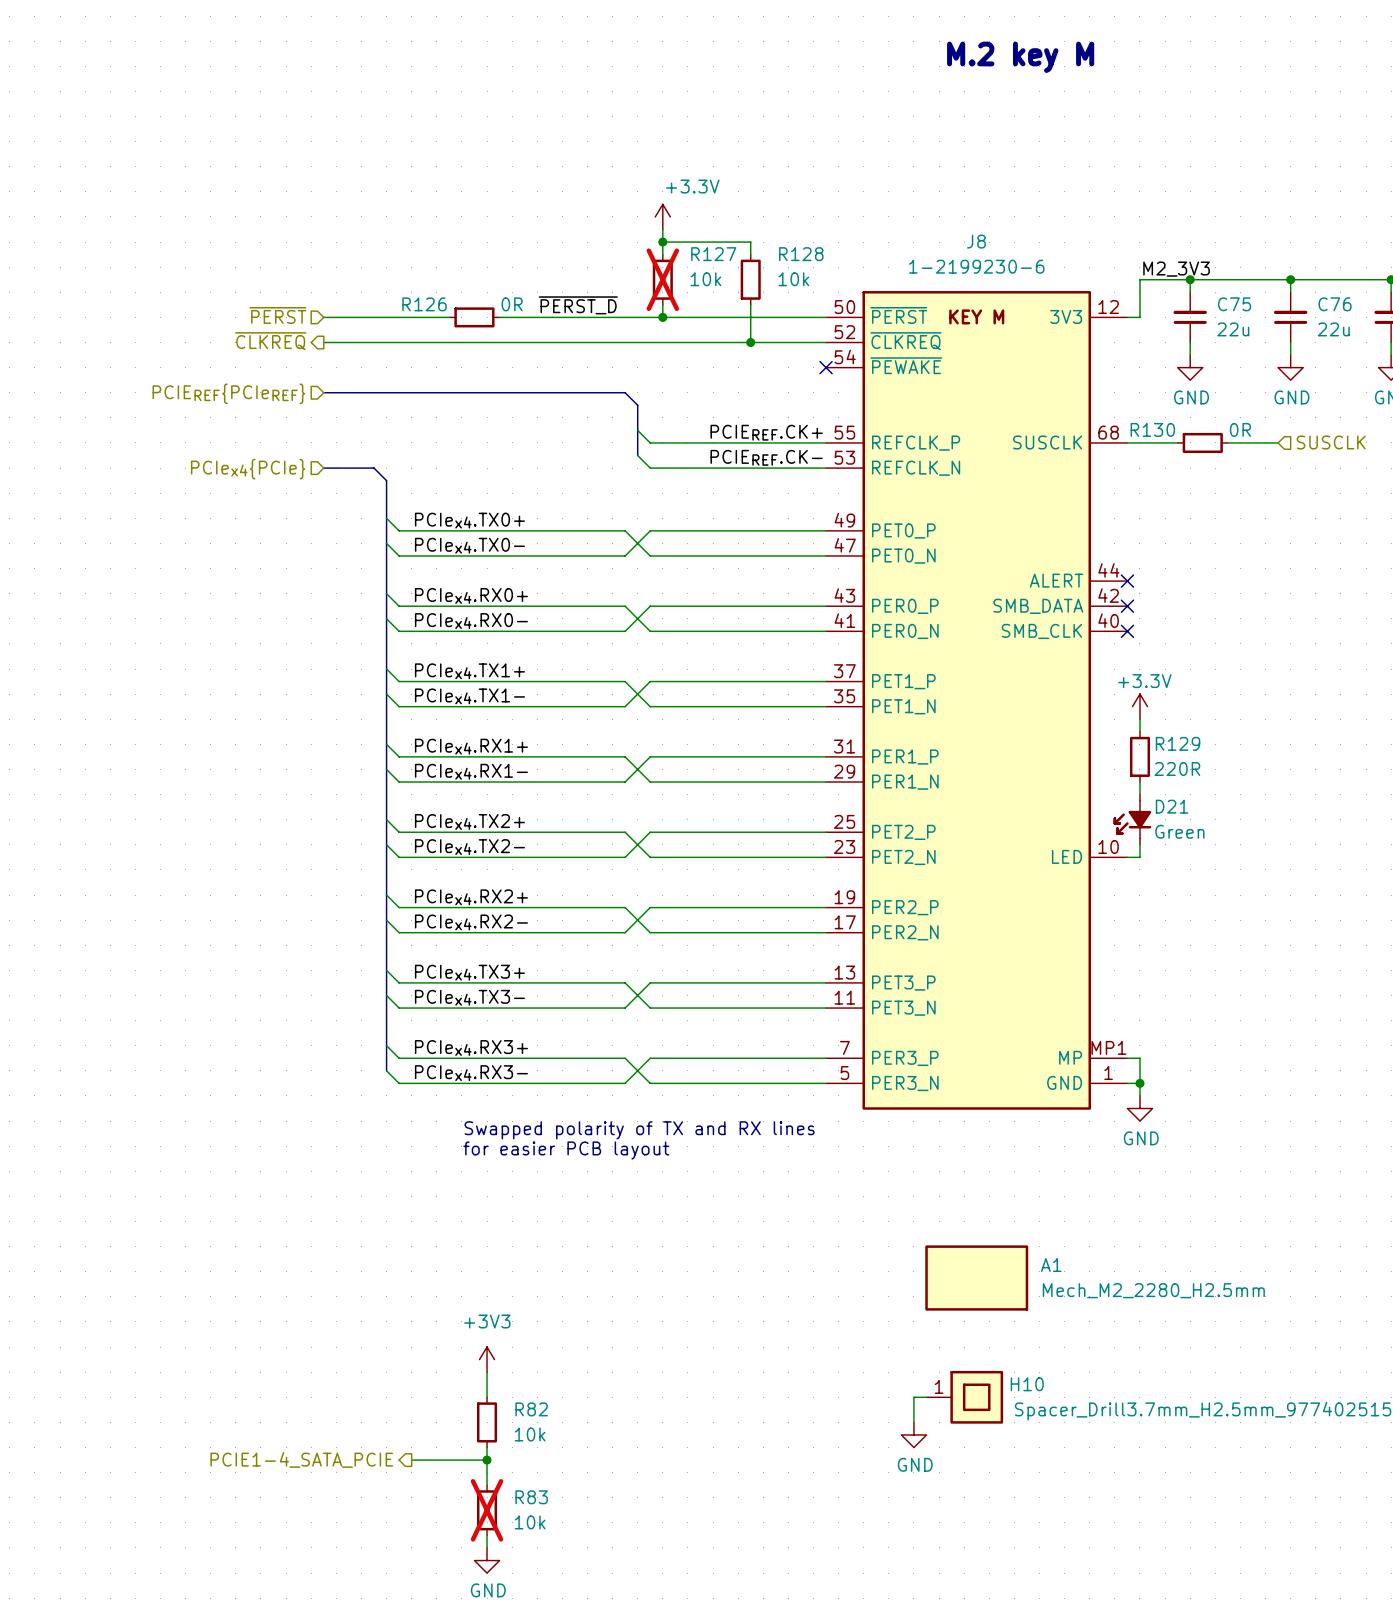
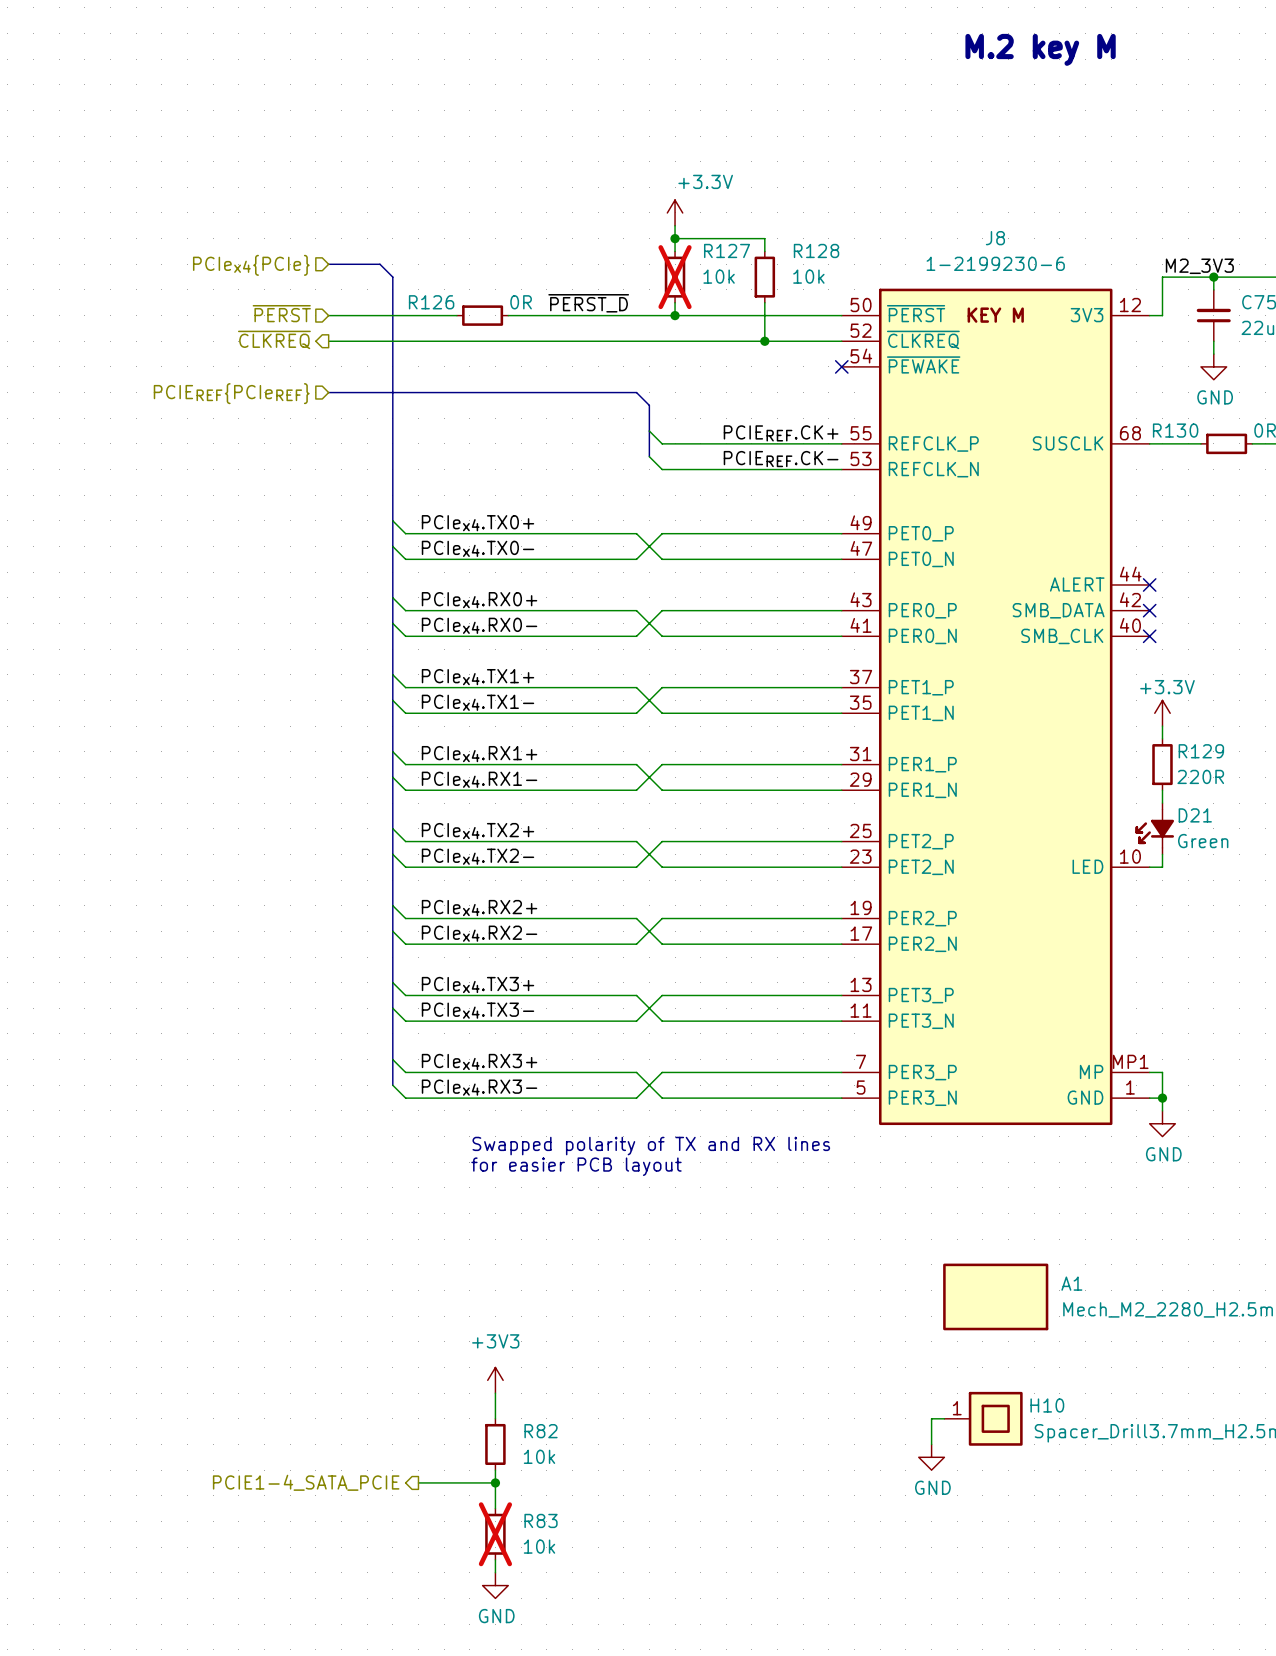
bus: (323, 468) (374, 468) (386, 480) -> (328, 264) (379, 264) (392, 277) (392, 482)
hierarchical label position: PCIex4{PCIe} (248, 469) -> PCIex4{PCIe} (251, 265)

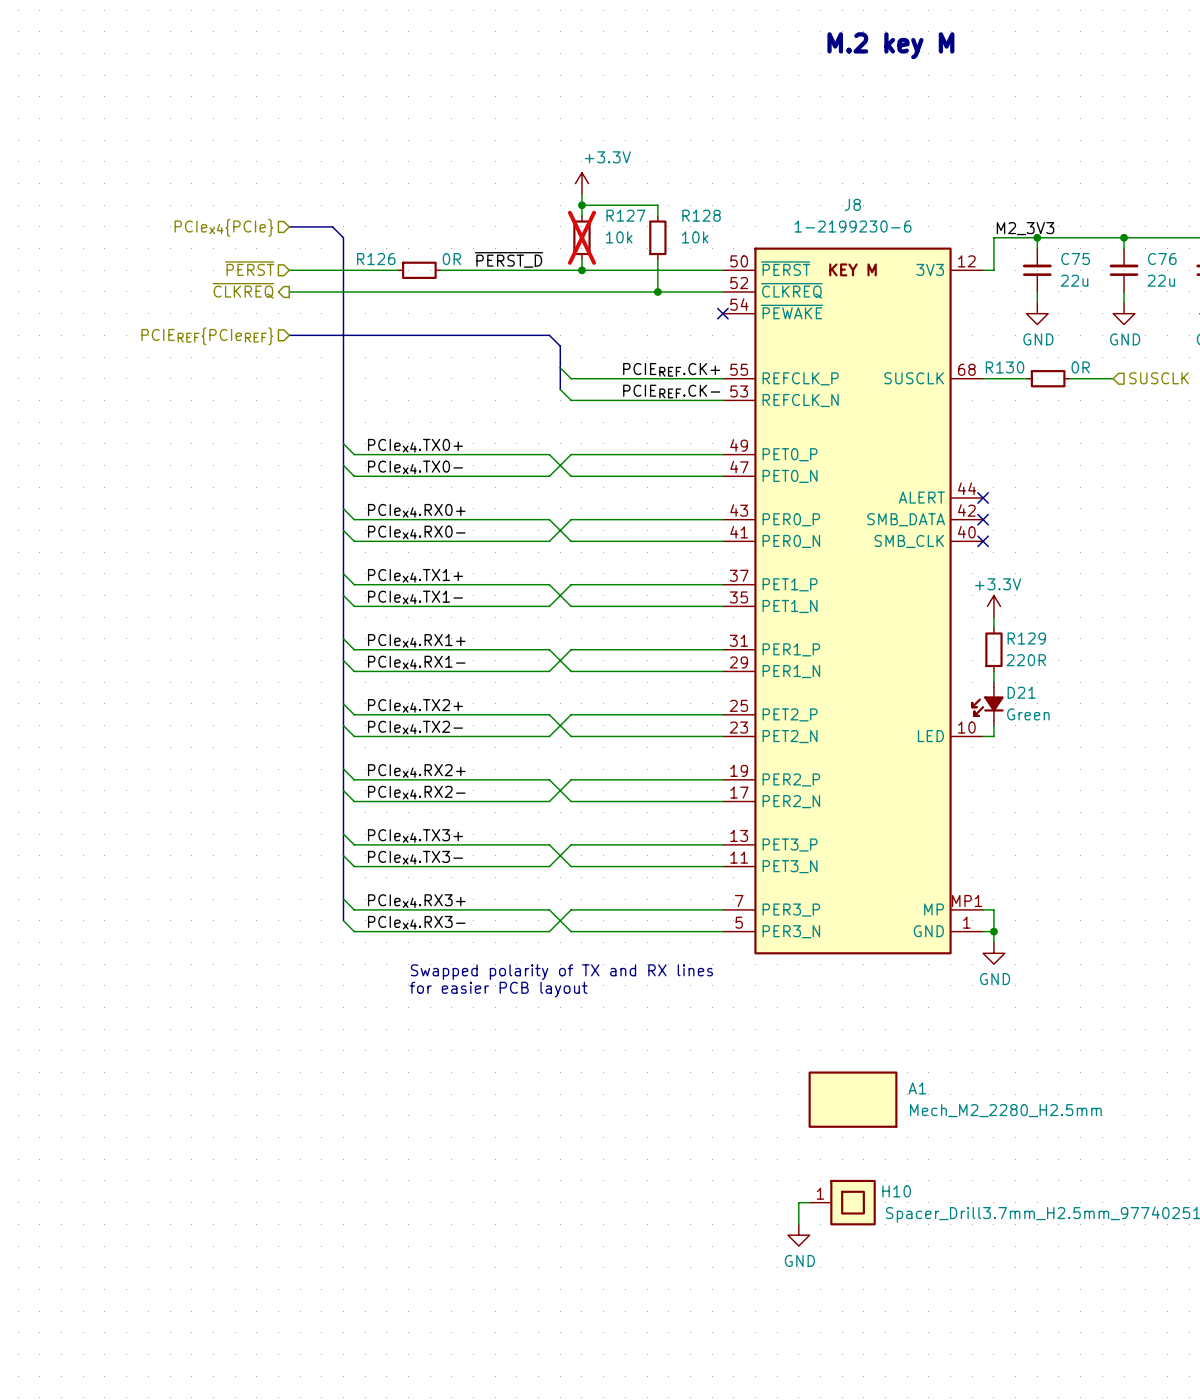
power symbol: +3V3 (495, 1380) -> none
wire: (495, 1393) (495, 1418) -> none
R82: (495, 1444) -> none
wire: (495, 1470) (495, 1508) -> none
hierarchical label: PCIE1-4_SATA_PCIE (306, 1482) -> none
wire: (418, 1482) (495, 1482) -> none
junction: (495, 1482) -> none
R83: (495, 1534) -> none
wire: (495, 1559) (495, 1572) -> none
power symbol: GND (495, 1585) -> none

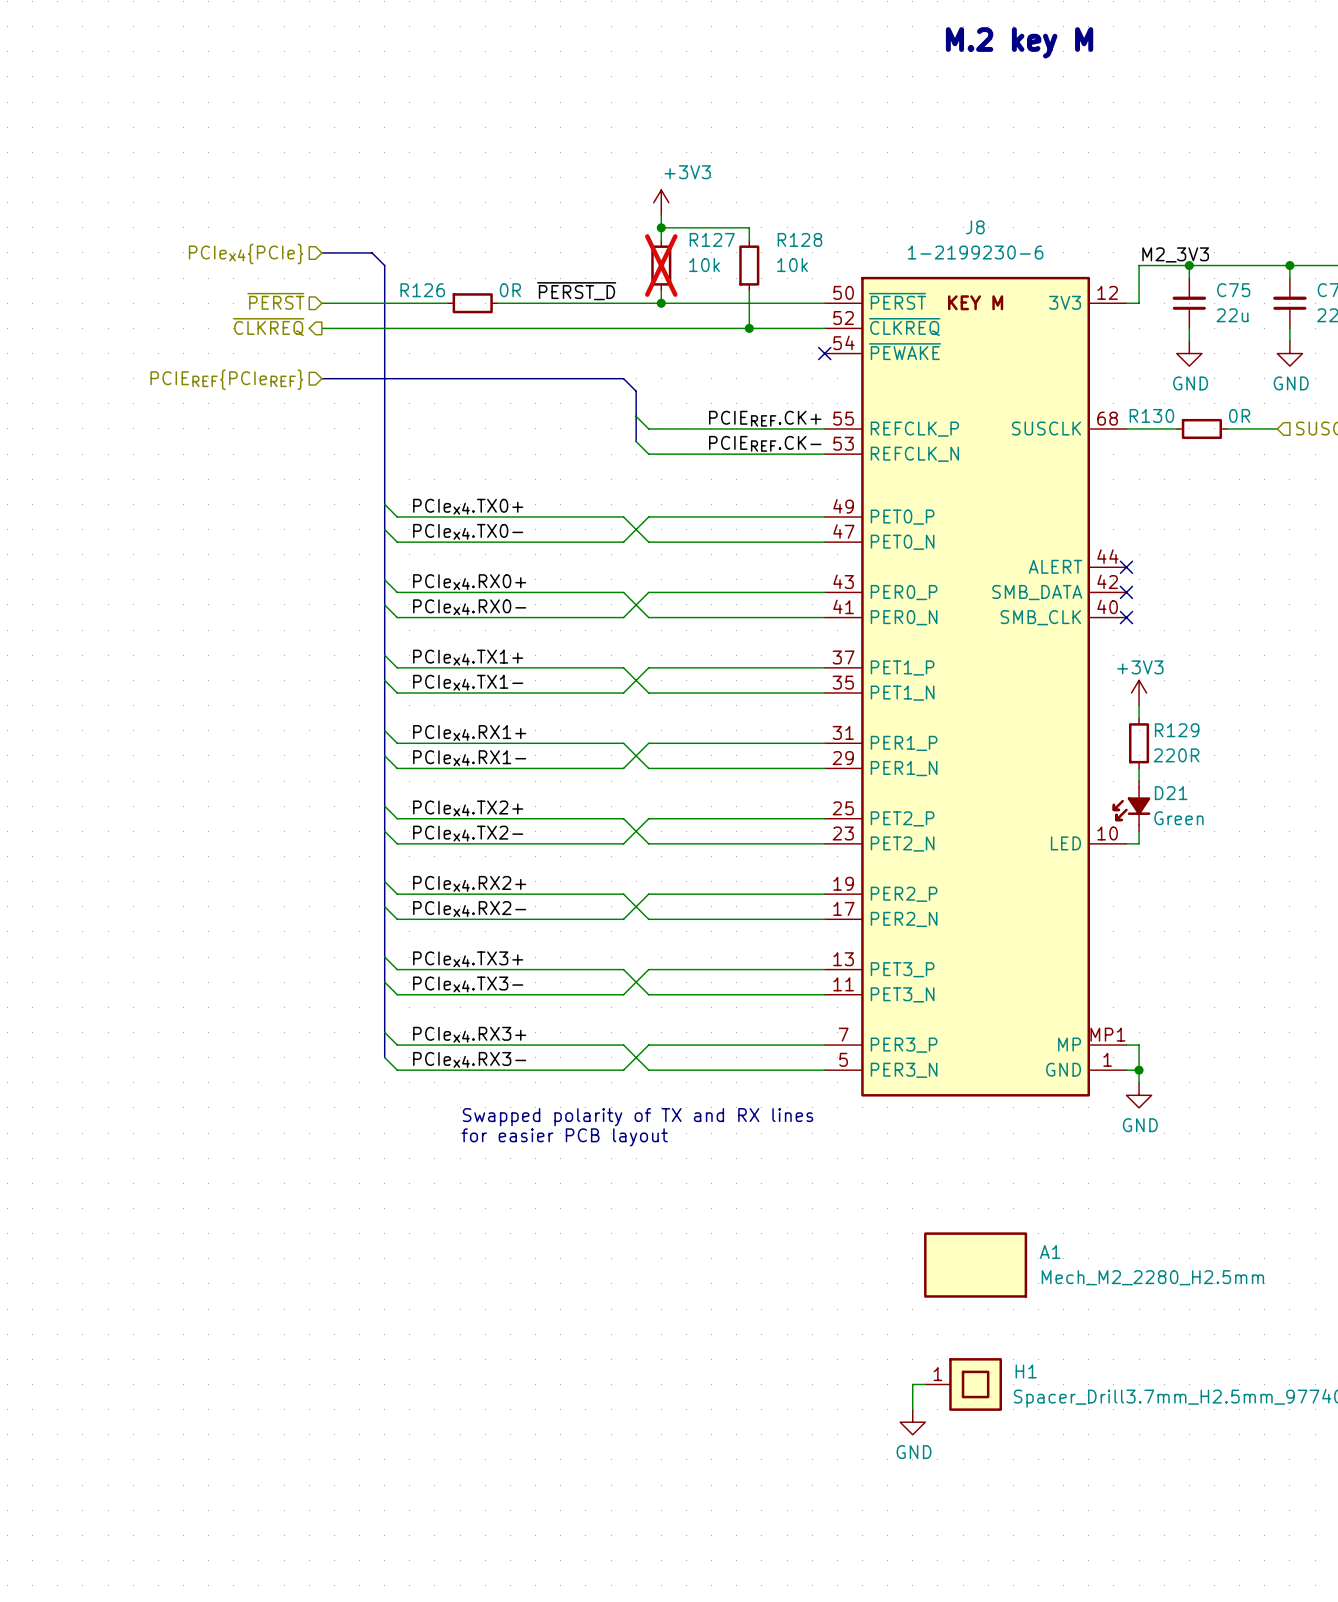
power symbol: +3.3V (581, 183) -> +3V3 (661, 202)
power symbol: +3.3V (993, 606) -> +3V3 (1139, 693)
H10 name: H10 (896, 1191) -> H1 (1026, 1371)

